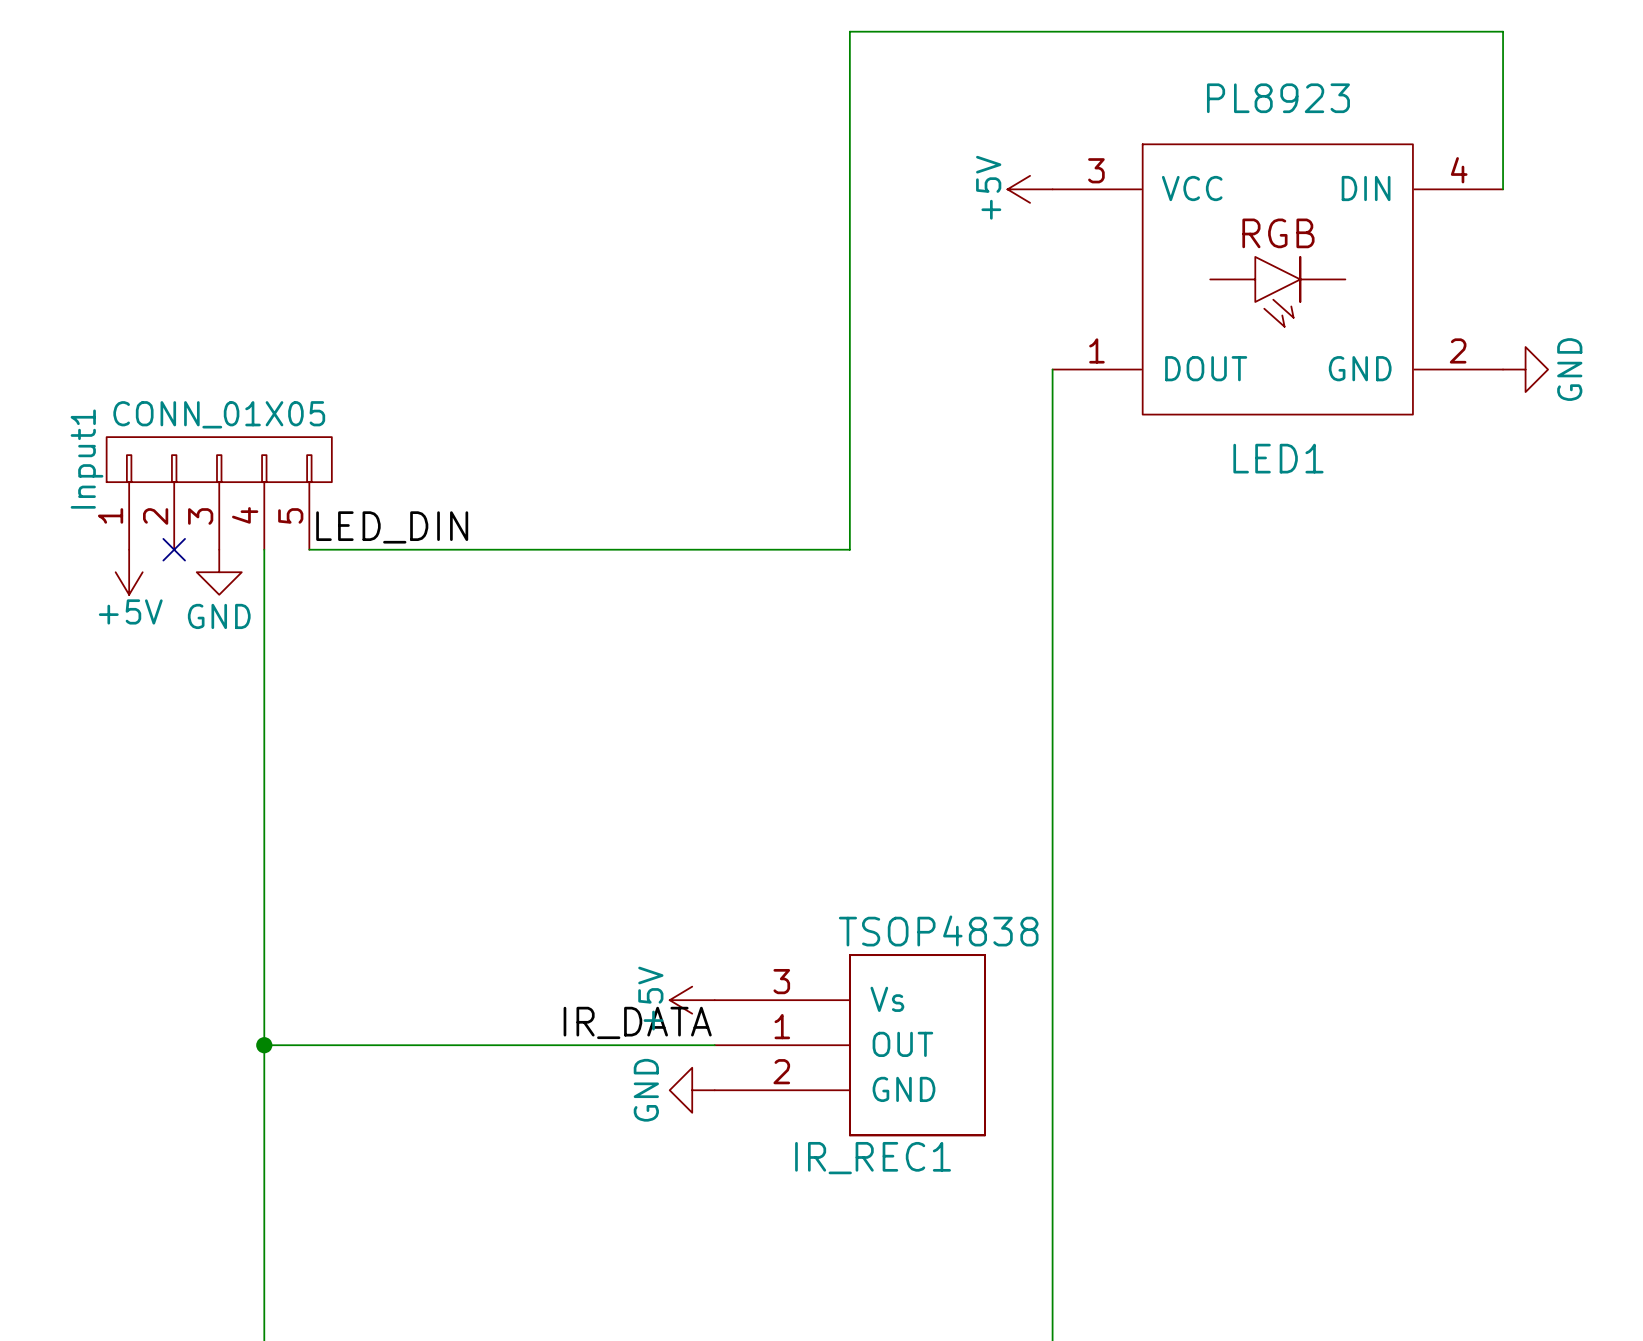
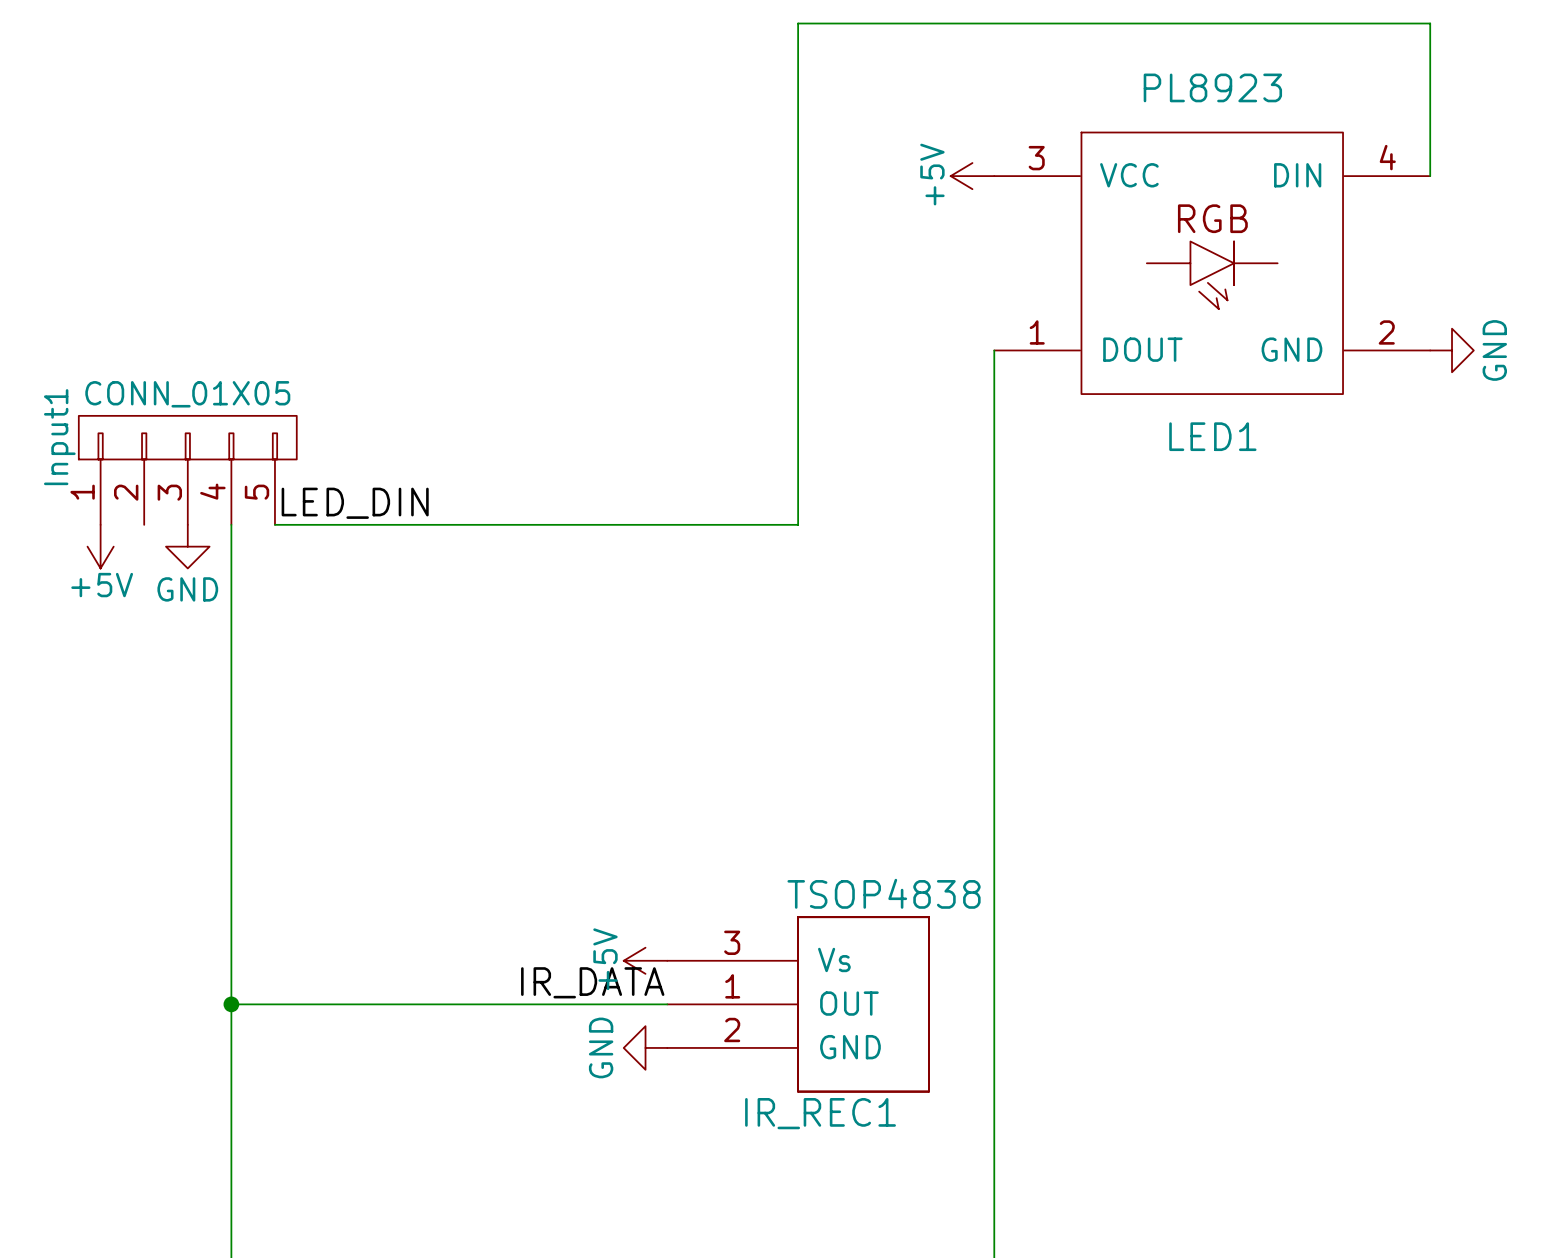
no-connect mark: (174, 549) -> none

